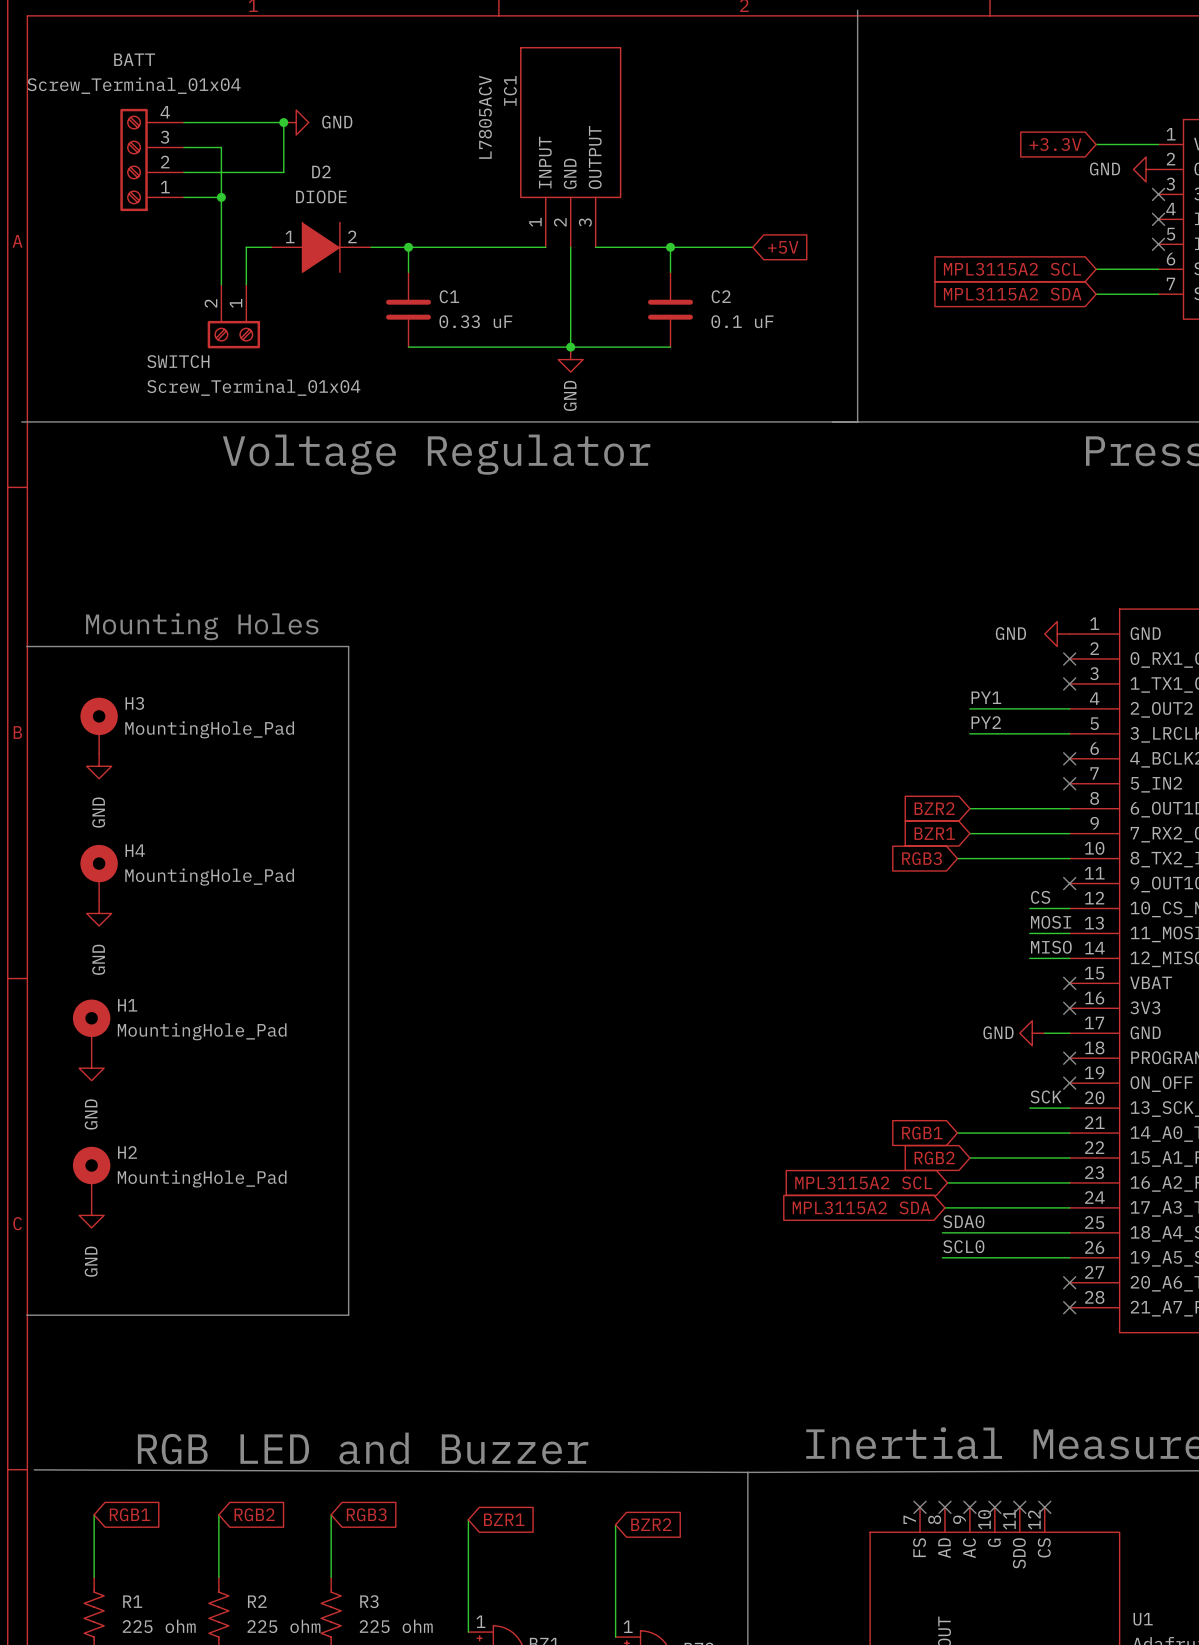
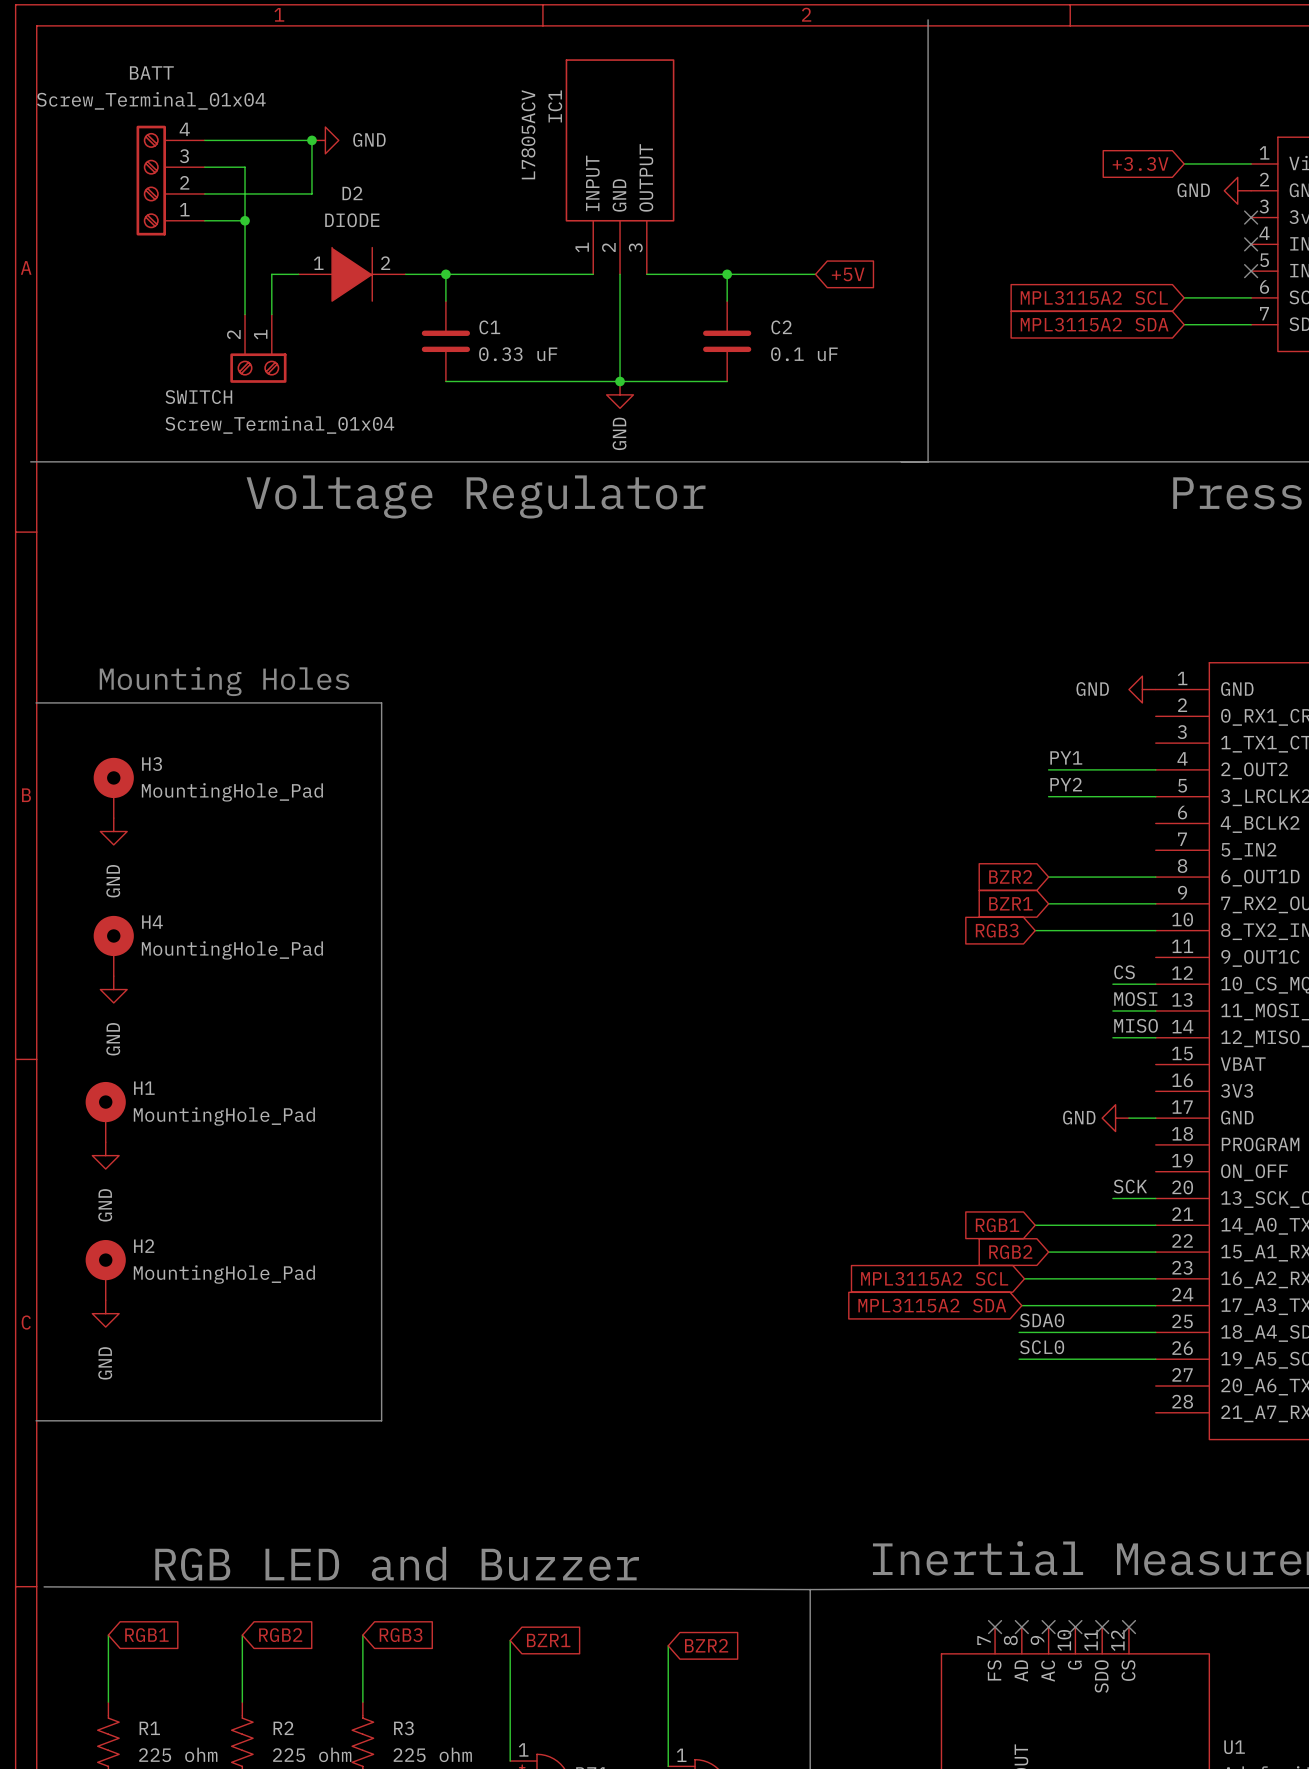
no-connect mark: (1069, 658) -> none
no-connect mark: (1069, 683) -> none
no-connect mark: (1069, 758) -> none
no-connect mark: (1069, 783) -> none
no-connect mark: (1069, 883) -> none
no-connect mark: (1069, 983) -> none
no-connect mark: (1069, 1008) -> none
no-connect mark: (1069, 1058) -> none
no-connect mark: (1069, 1083) -> none
no-connect mark: (1069, 1282) -> none
no-connect mark: (1069, 1307) -> none

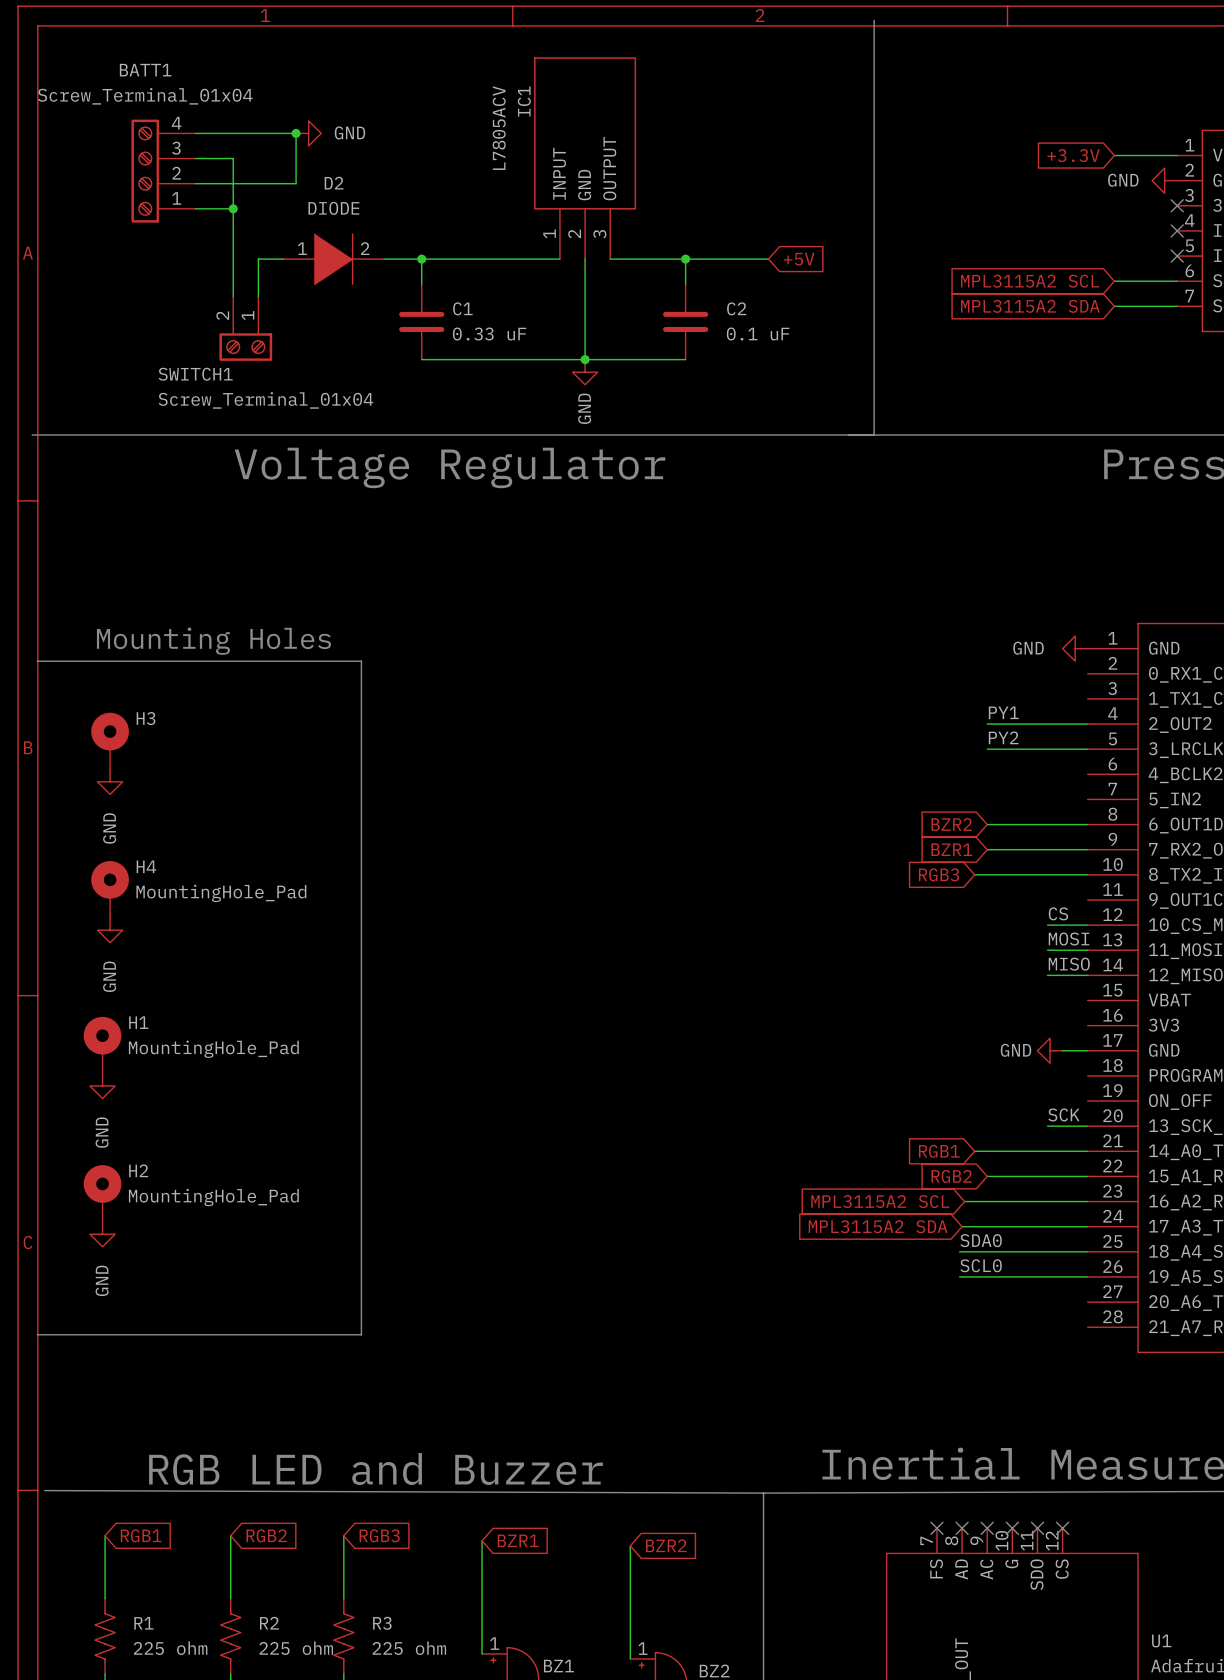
BATT name: BATT (151, 72) -> BATT1 (145, 70)
SWITCH name: SWITCH (198, 397) -> SWITCH1 (195, 374)
H3 value: MountingHole_Pad (232, 792) -> none

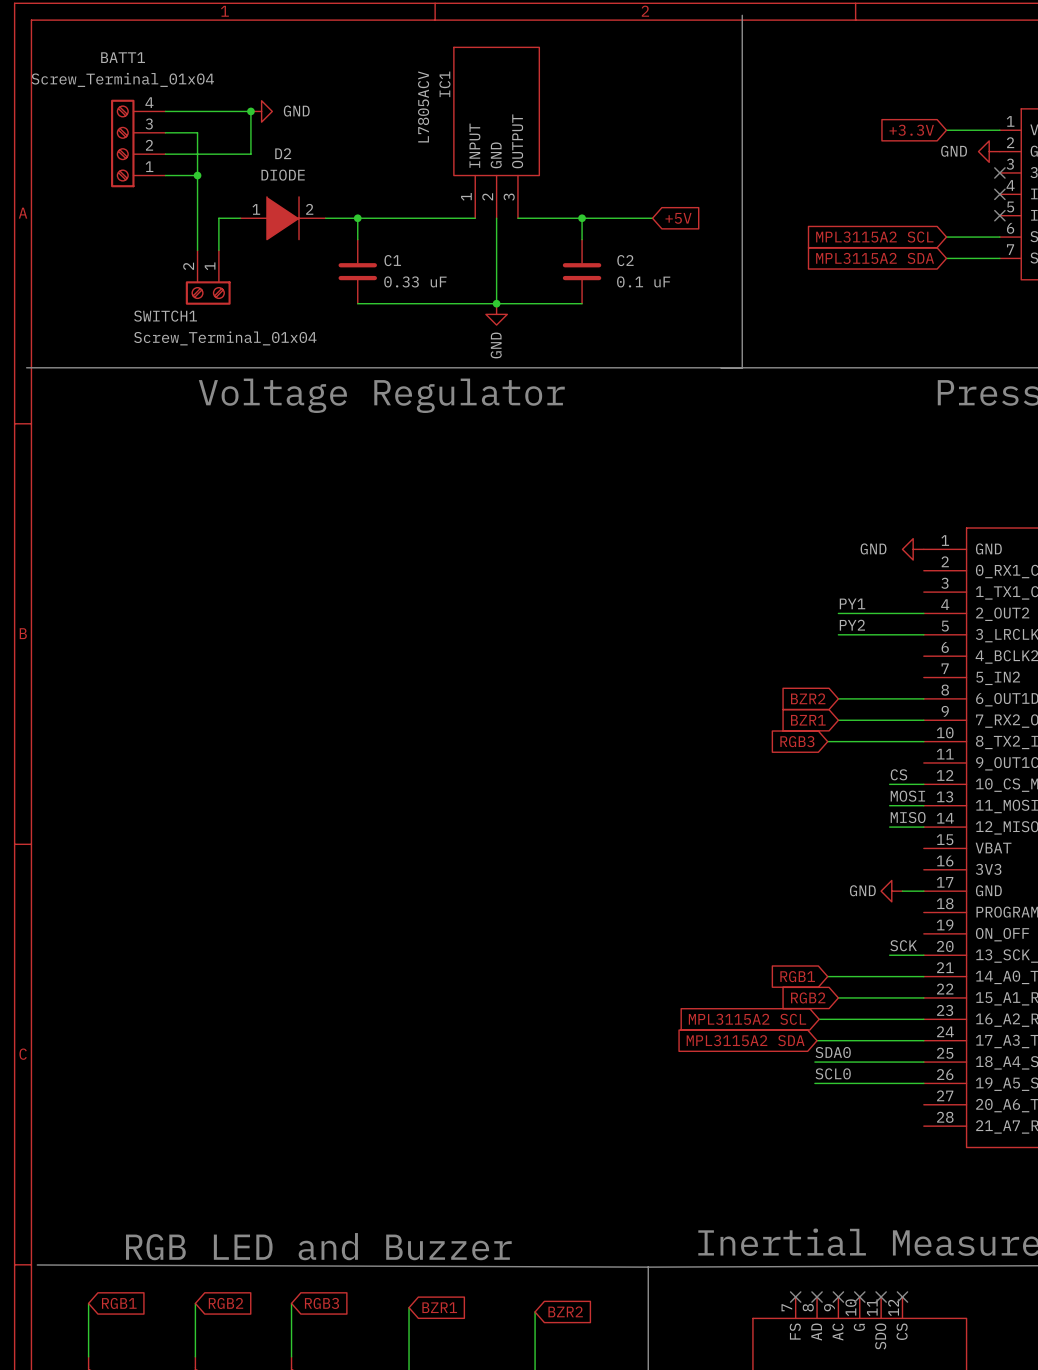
text: Mounting Holes (213, 641) -> none
line: (37, 661) (361, 661) (361, 1334) (37, 1334) -> none
H3: (110, 741) -> none
power symbol: GND (110, 781) -> none
H4: MountingHole_Pad (110, 889) -> none
power symbol: GND (110, 930) -> none
H1: MountingHole_Pad (102, 1045) -> none
power symbol: GND (102, 1085) -> none
H2: MountingHole_Pad (102, 1193) -> none
power symbol: GND (102, 1234) -> none

